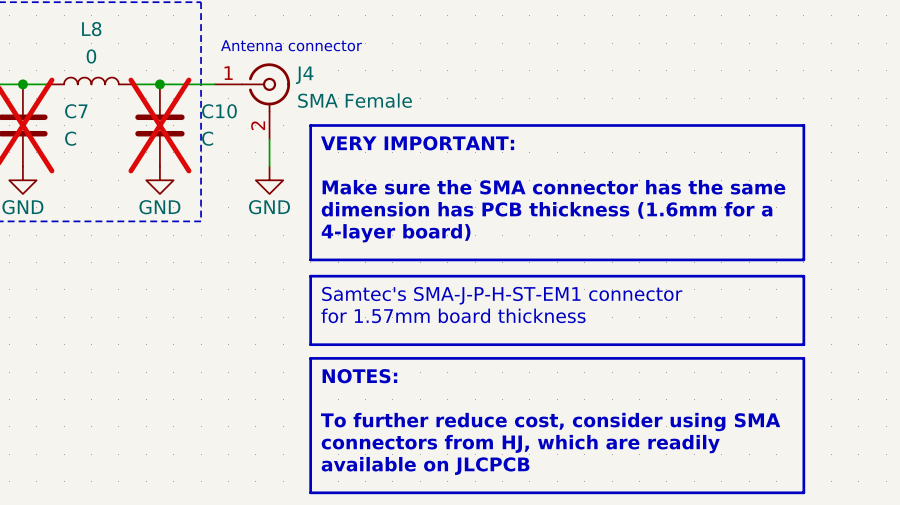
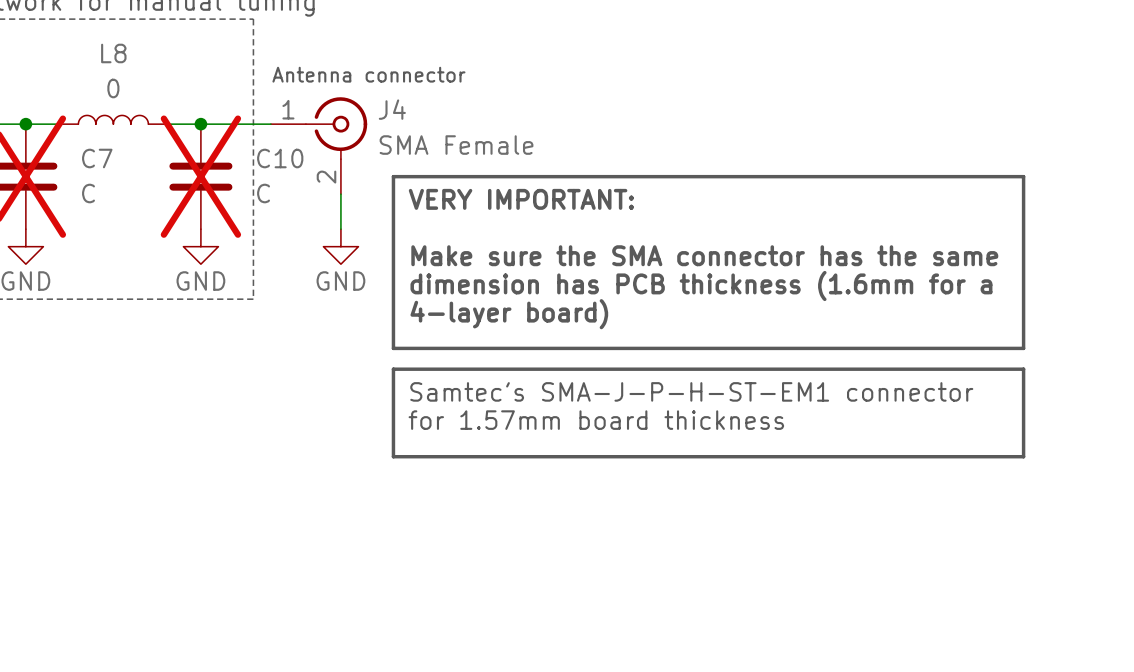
line: (310, 358) (803, 358) (803, 492) (310, 492) (310, 358) -> none
text: NOTES: (359, 376) -> none
text: To further reduce cost, consider using SMA (550, 422) -> none
text: connectors from HJ, which are readily (520, 444) -> none
text: available on JLCPCB (425, 465) -> none

